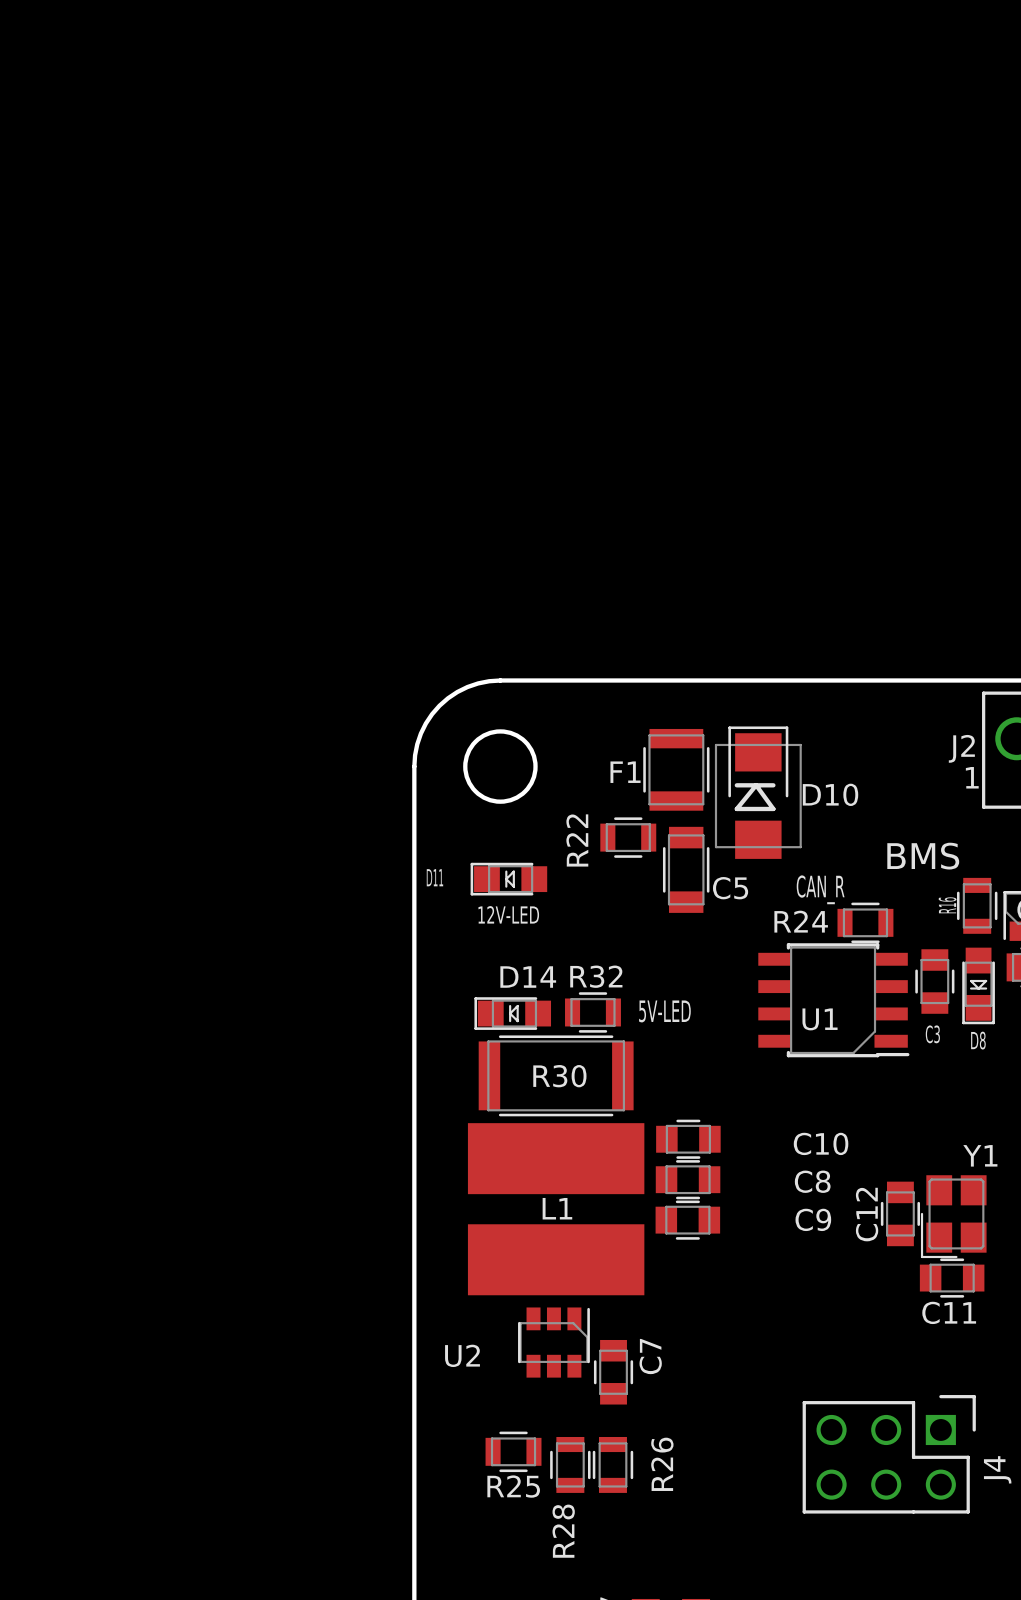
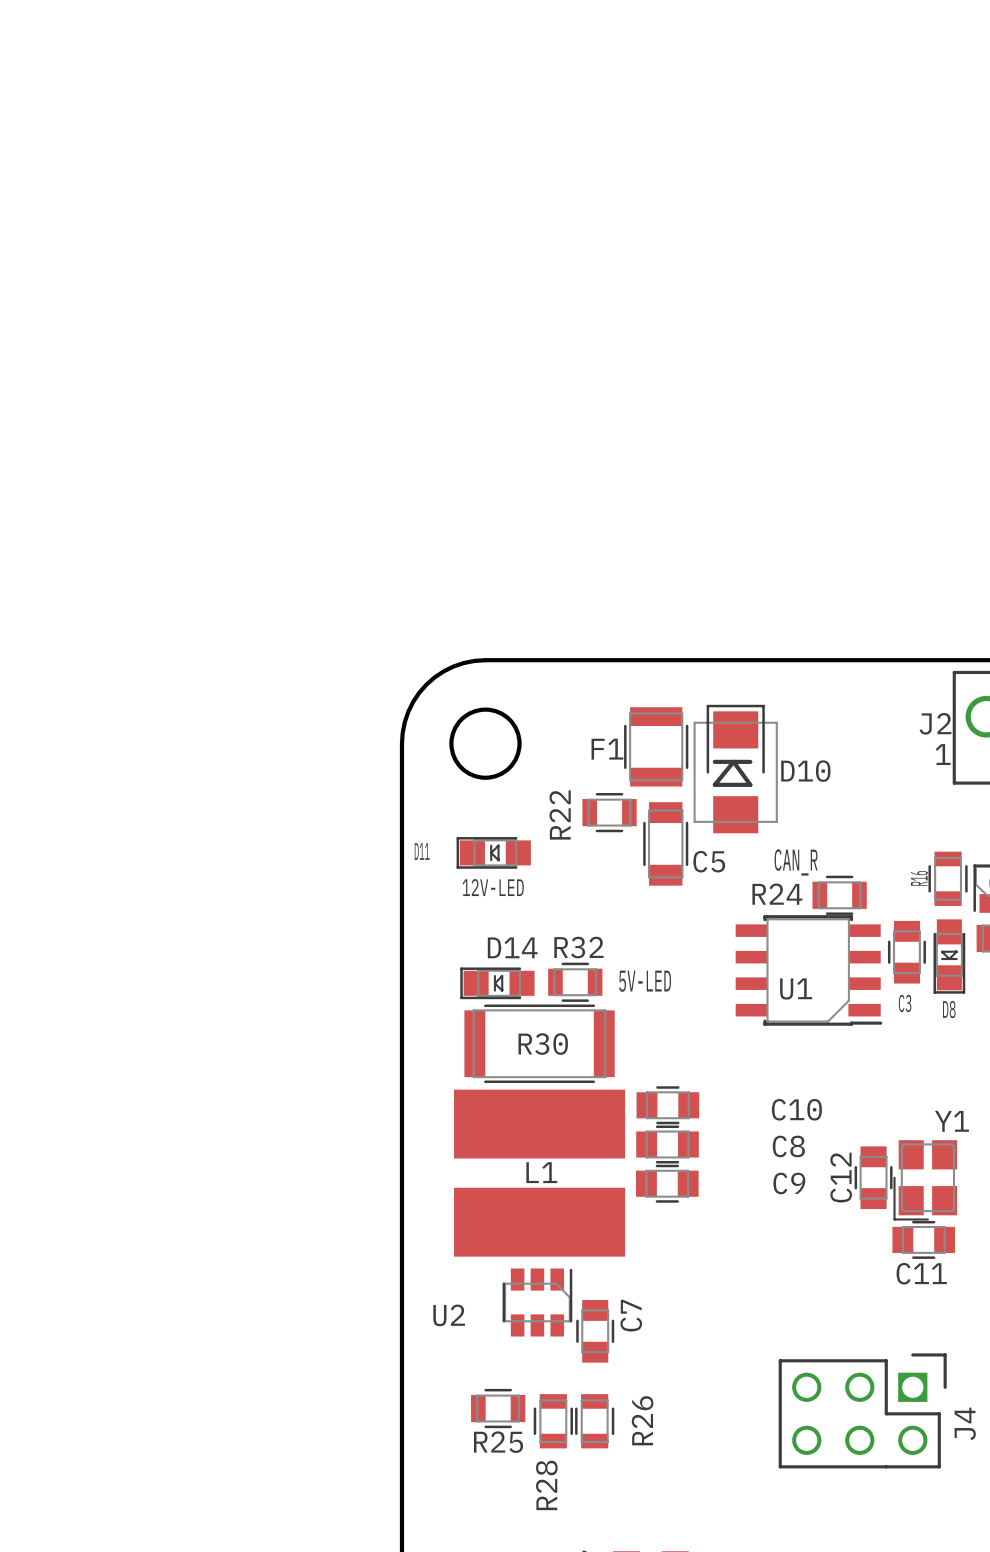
text: BMS (923, 856) -> none

